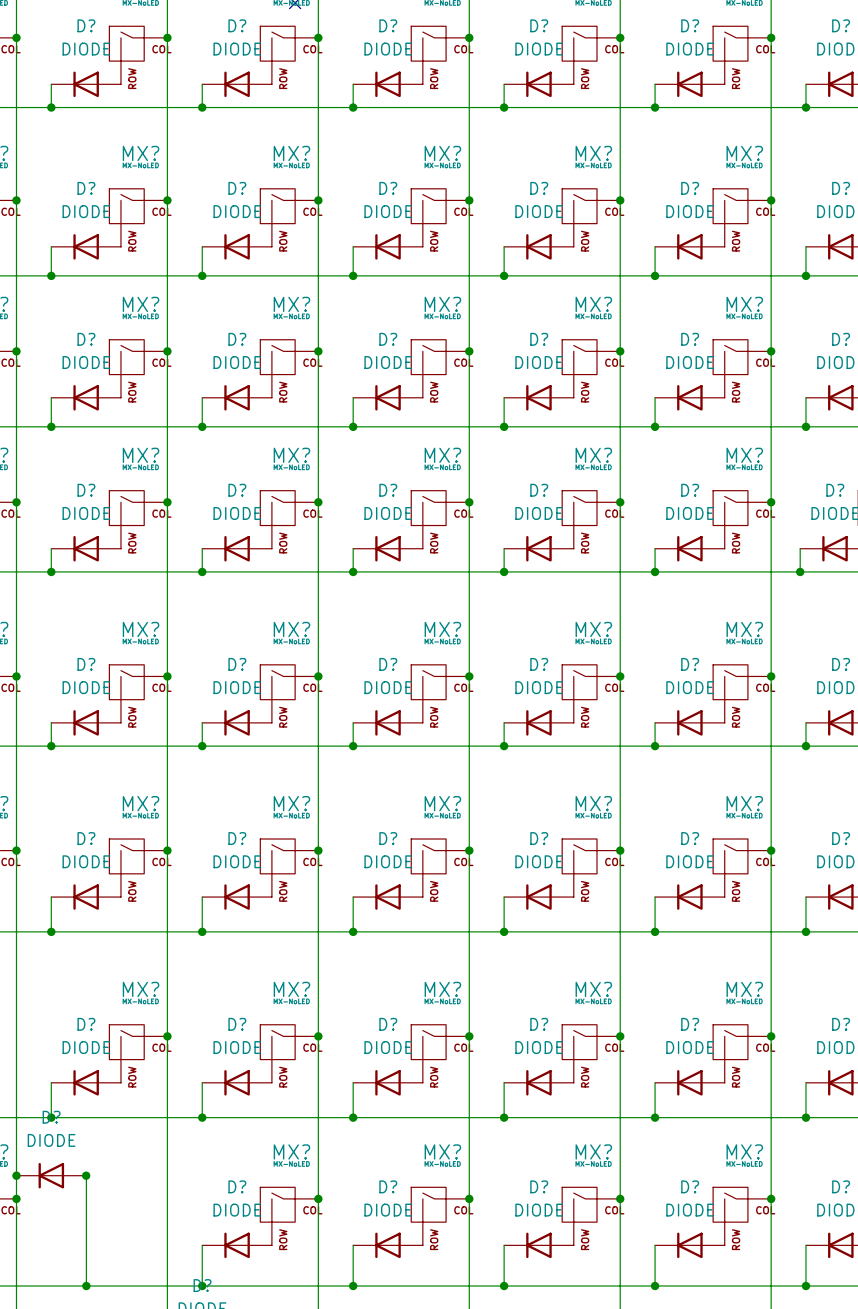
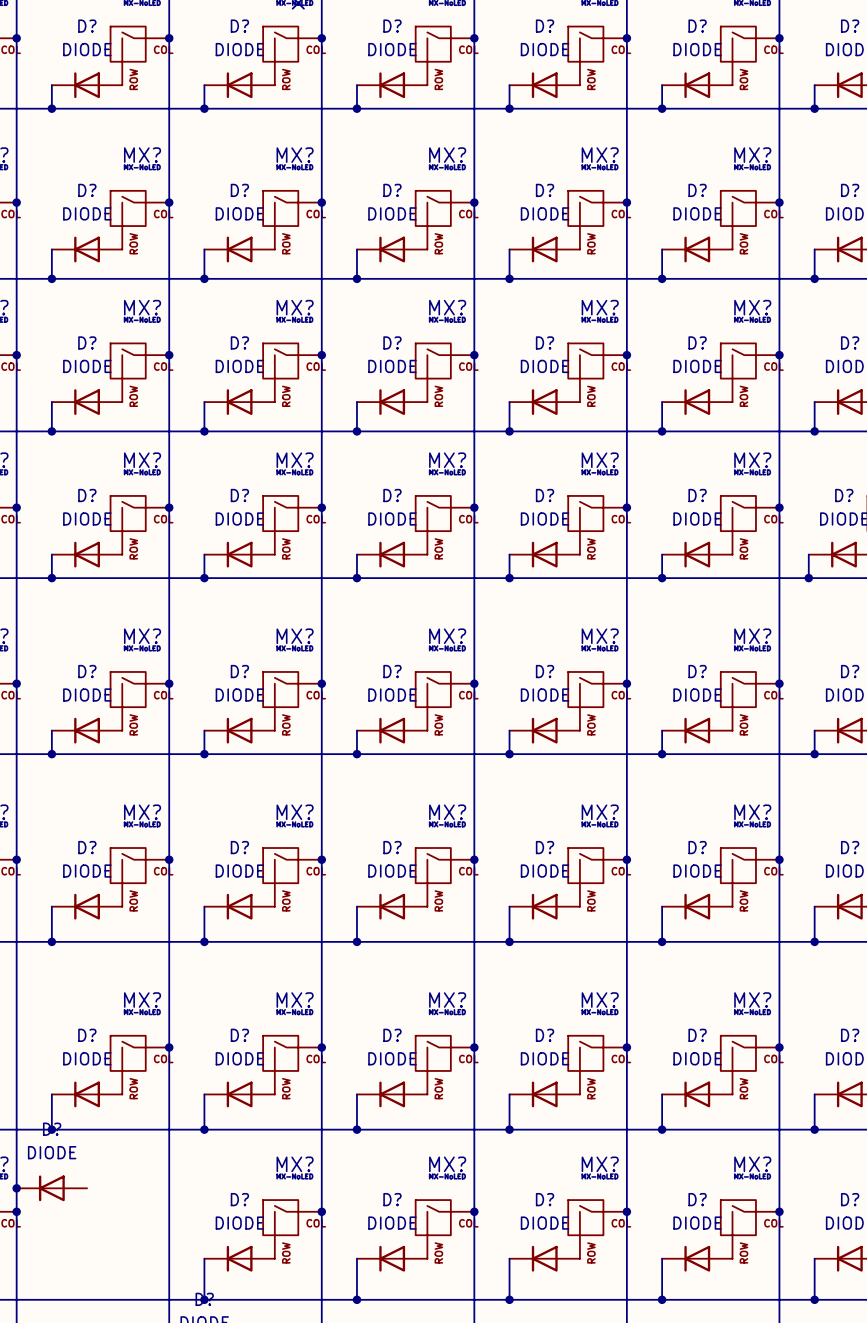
wire: (86, 1175) (86, 1286) -> none
junction: (86, 1175) -> none
junction: (86, 1286) -> none

